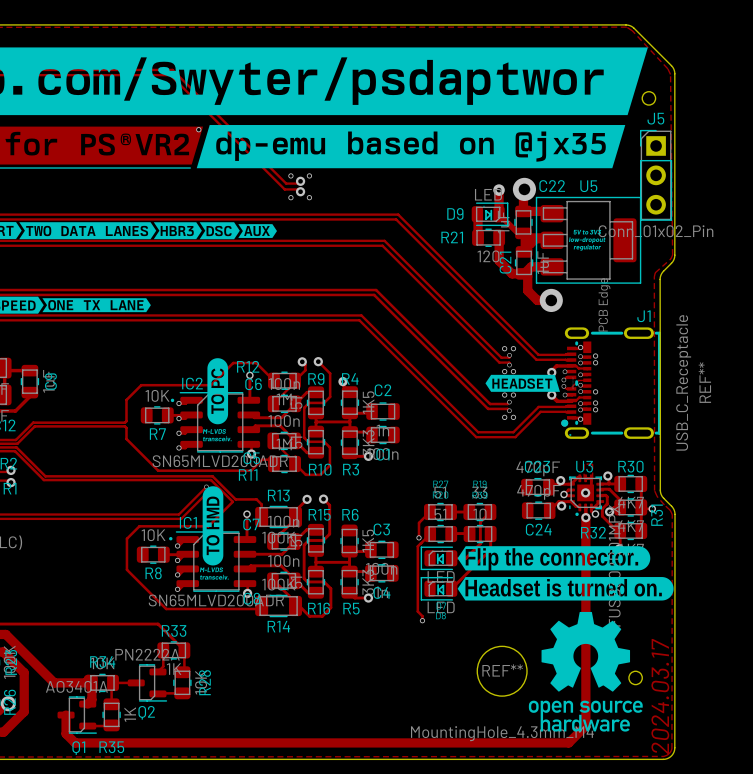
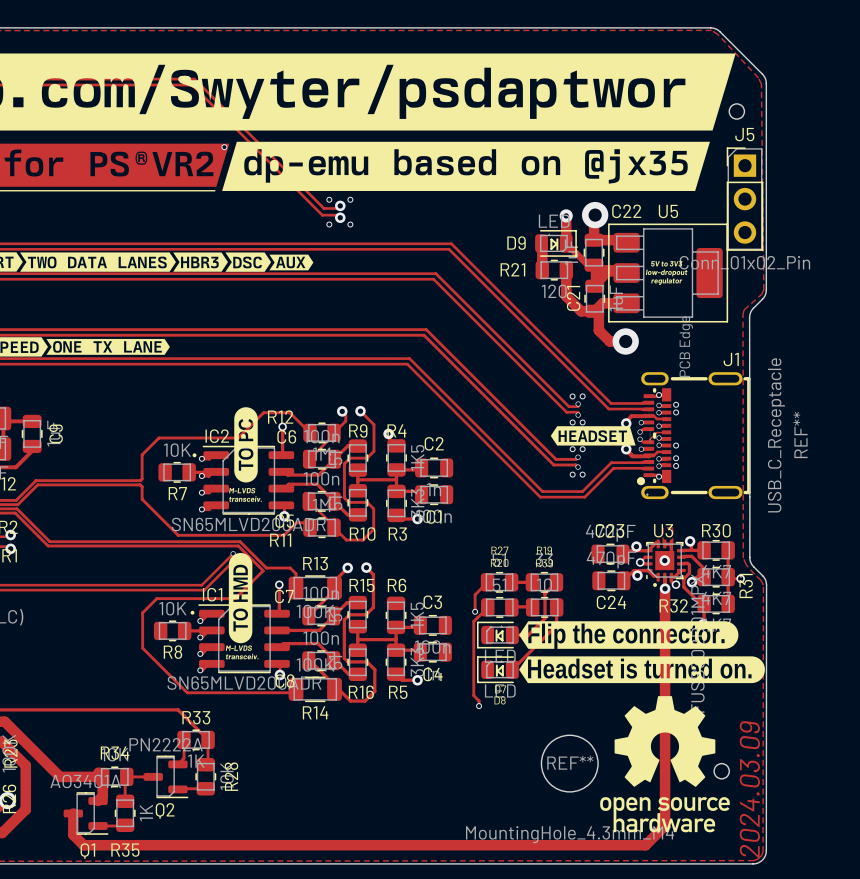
text: 2024.03.17 (660, 696) -> 2024.03.09 (749, 789)

